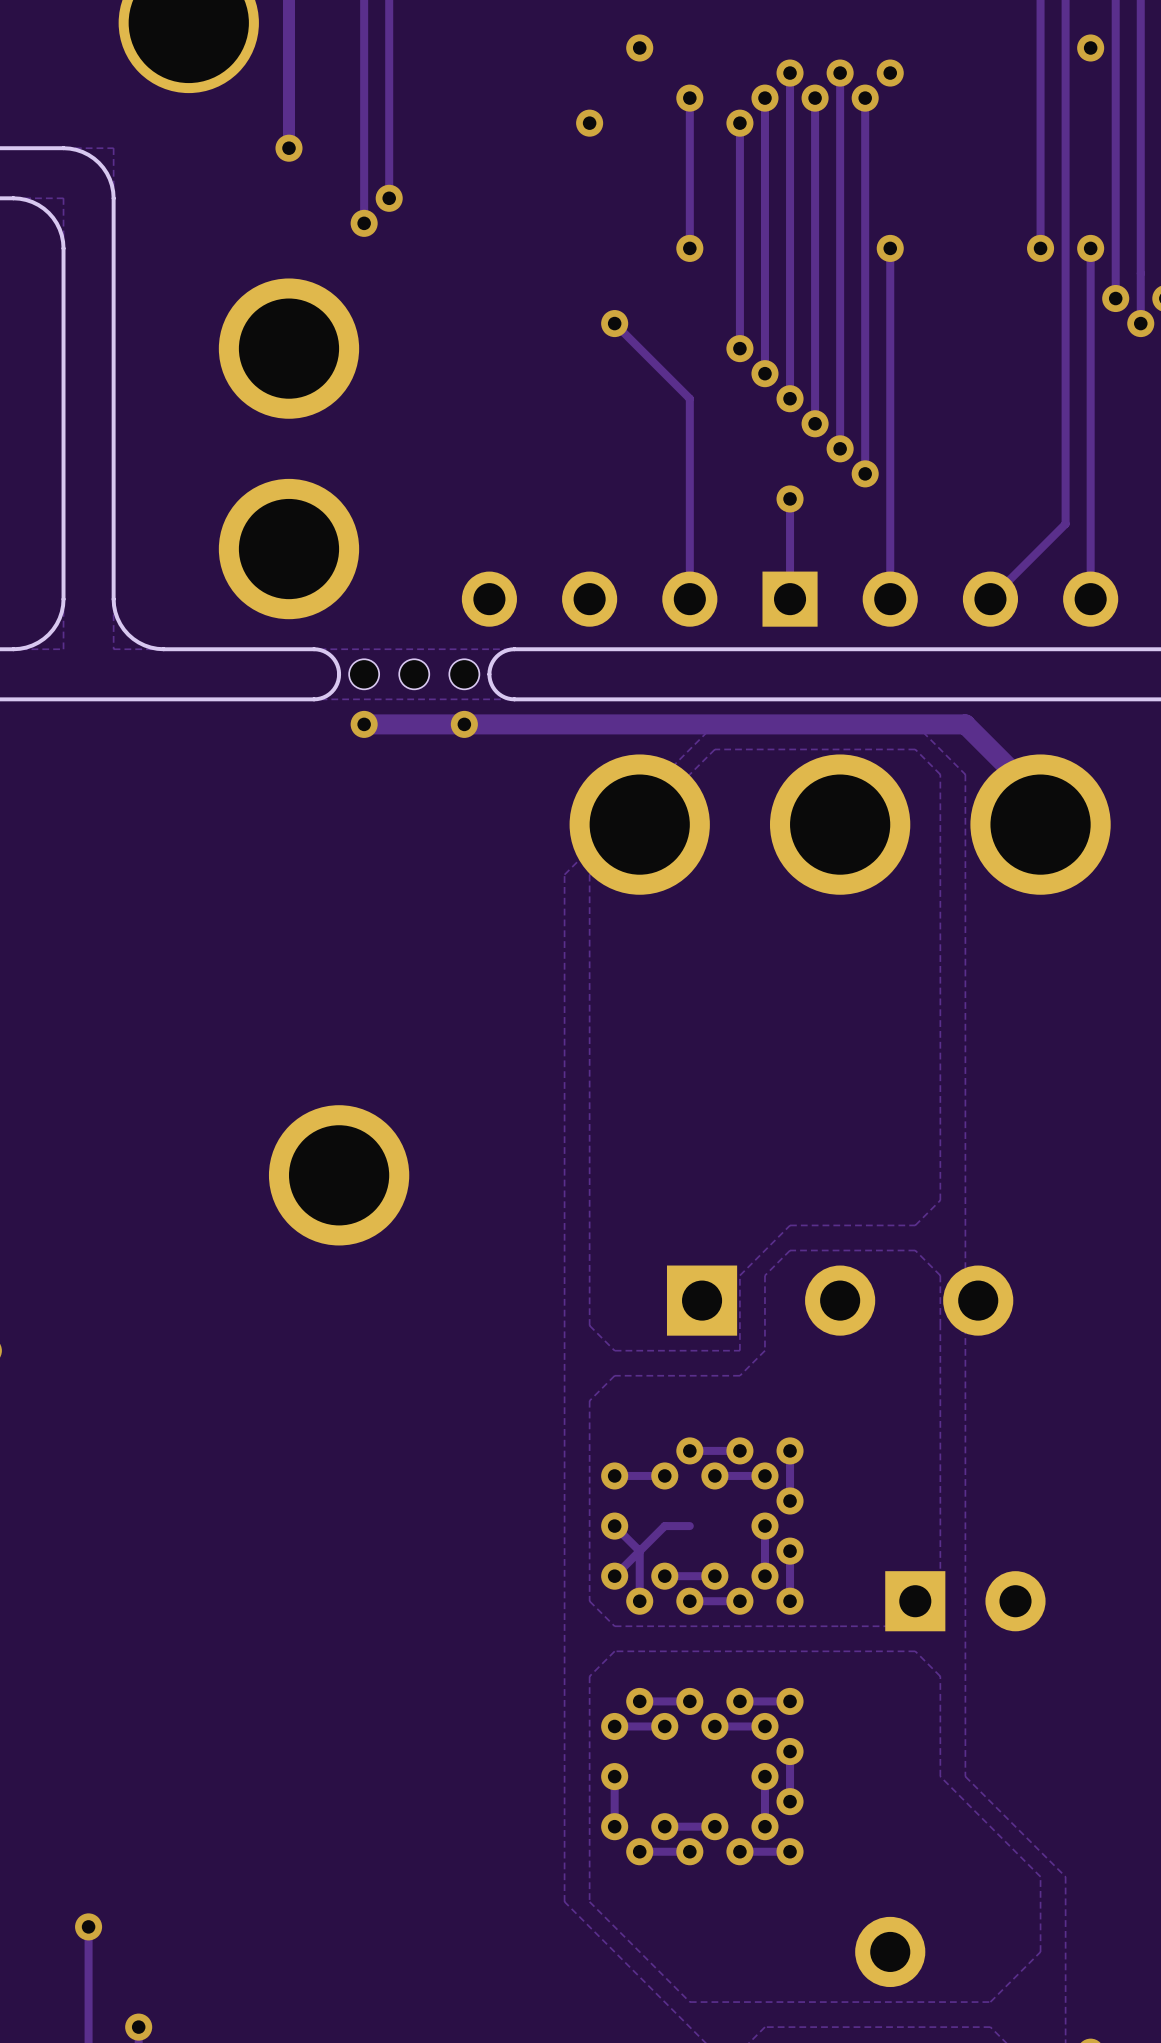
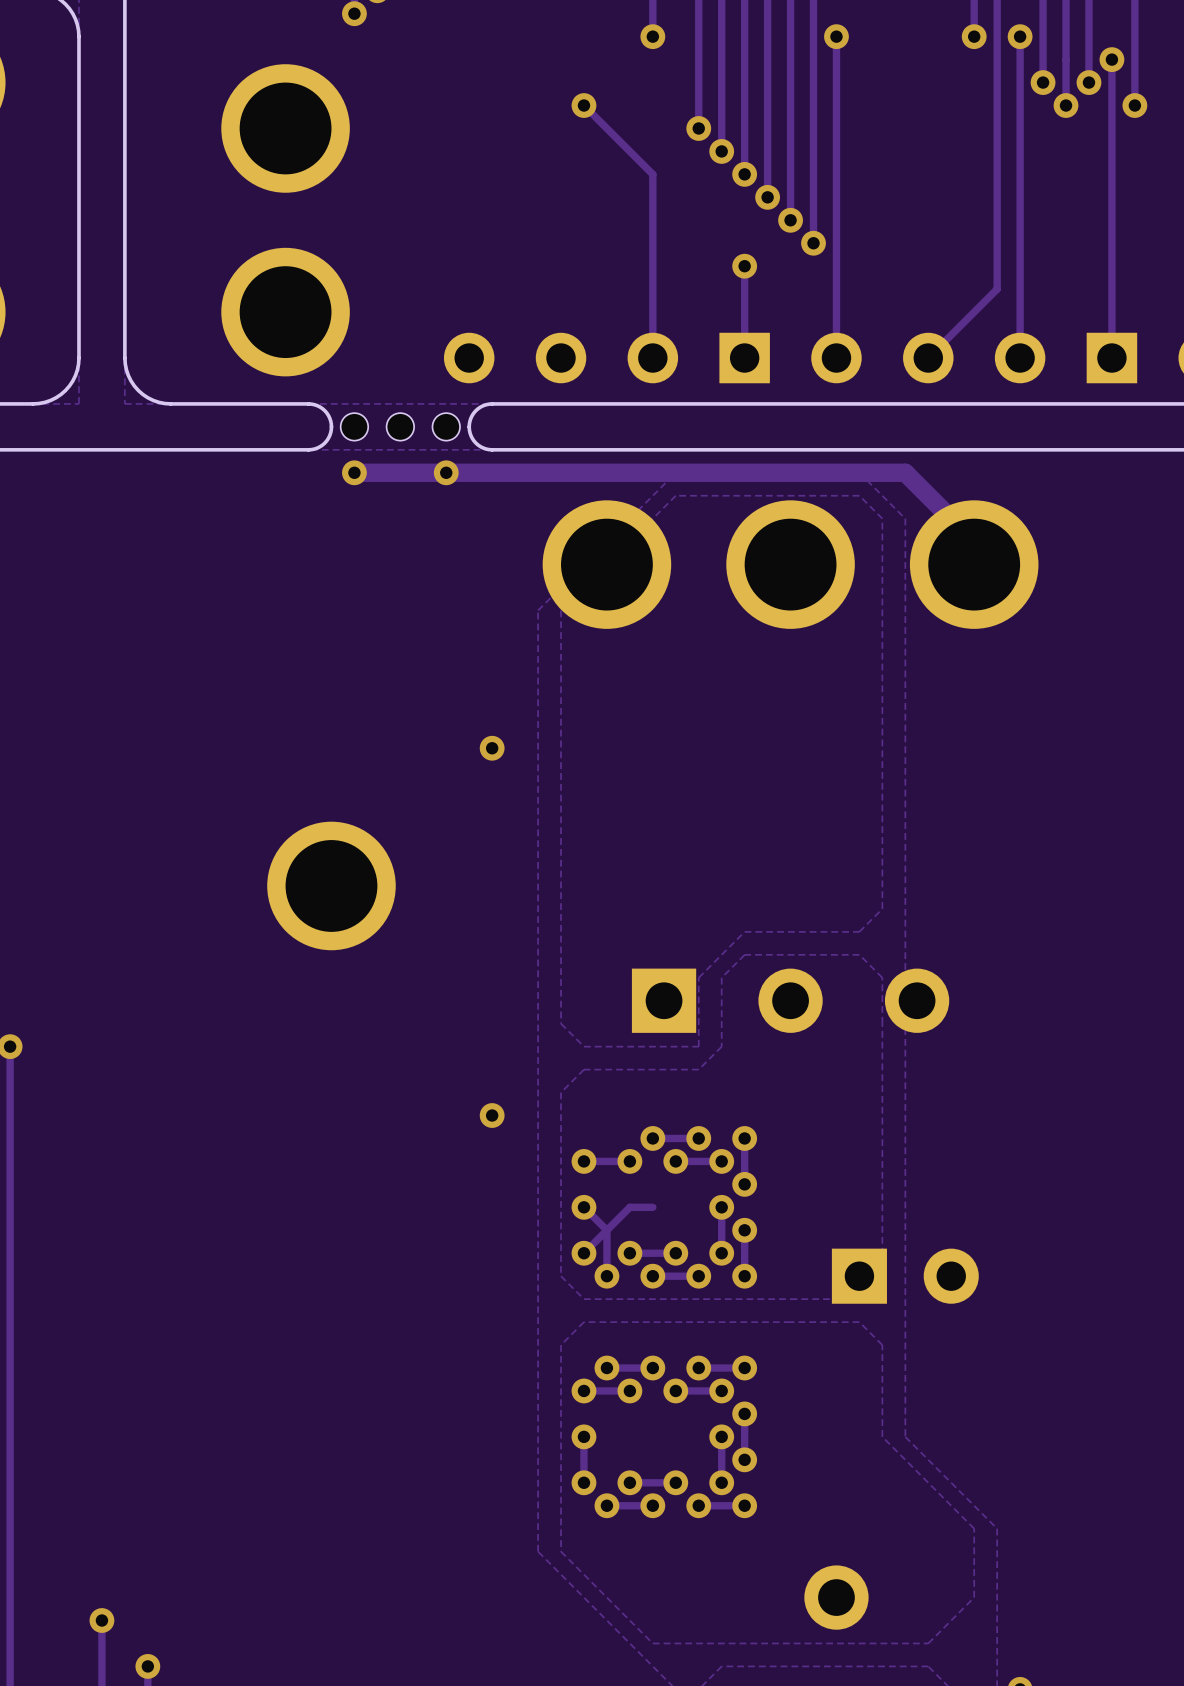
via: none -> (492, 748)
via: none -> (492, 1115)
track: (88, 1926) (88, 1977) -> none
via position: (88, 1926) -> (101, 1620)

